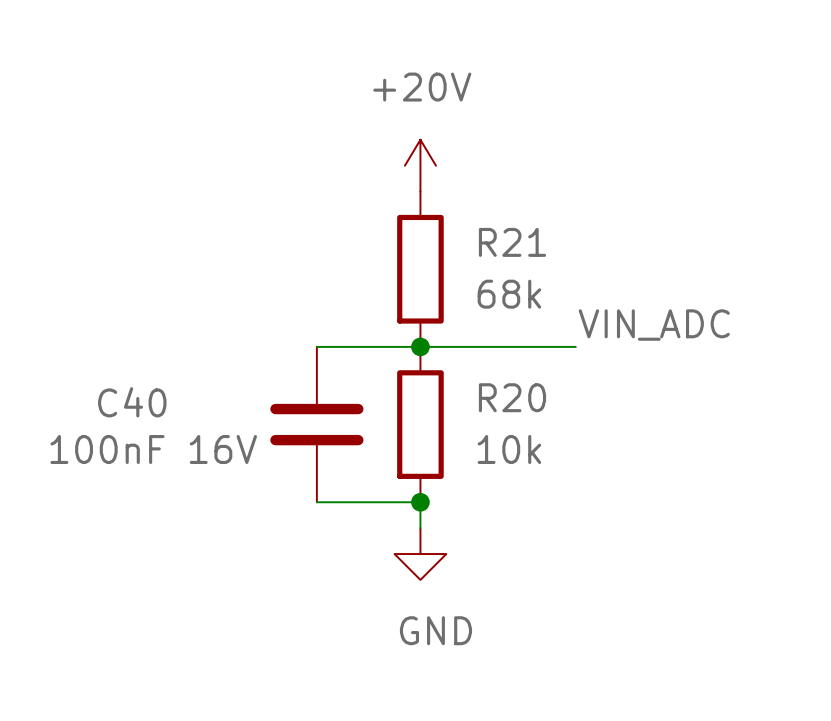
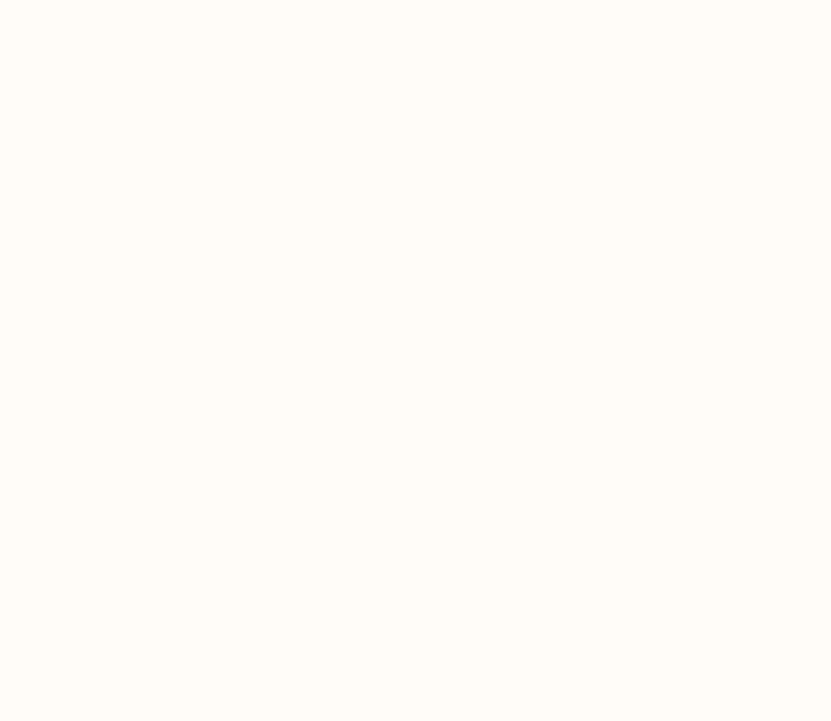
power symbol: +20V (420, 165) -> none
R21: 68k (420, 269) -> none
label: VIN_ADC (654, 325) -> none
wire: (316, 346) (575, 346) -> none
junction: (420, 346) -> none
C40: 100nF 16V (316, 424) -> none
R20: 10k (420, 424) -> none
wire: (316, 502) (420, 502) (420, 528) -> none
junction: (420, 502) -> none
power symbol: GND (420, 554) -> none

